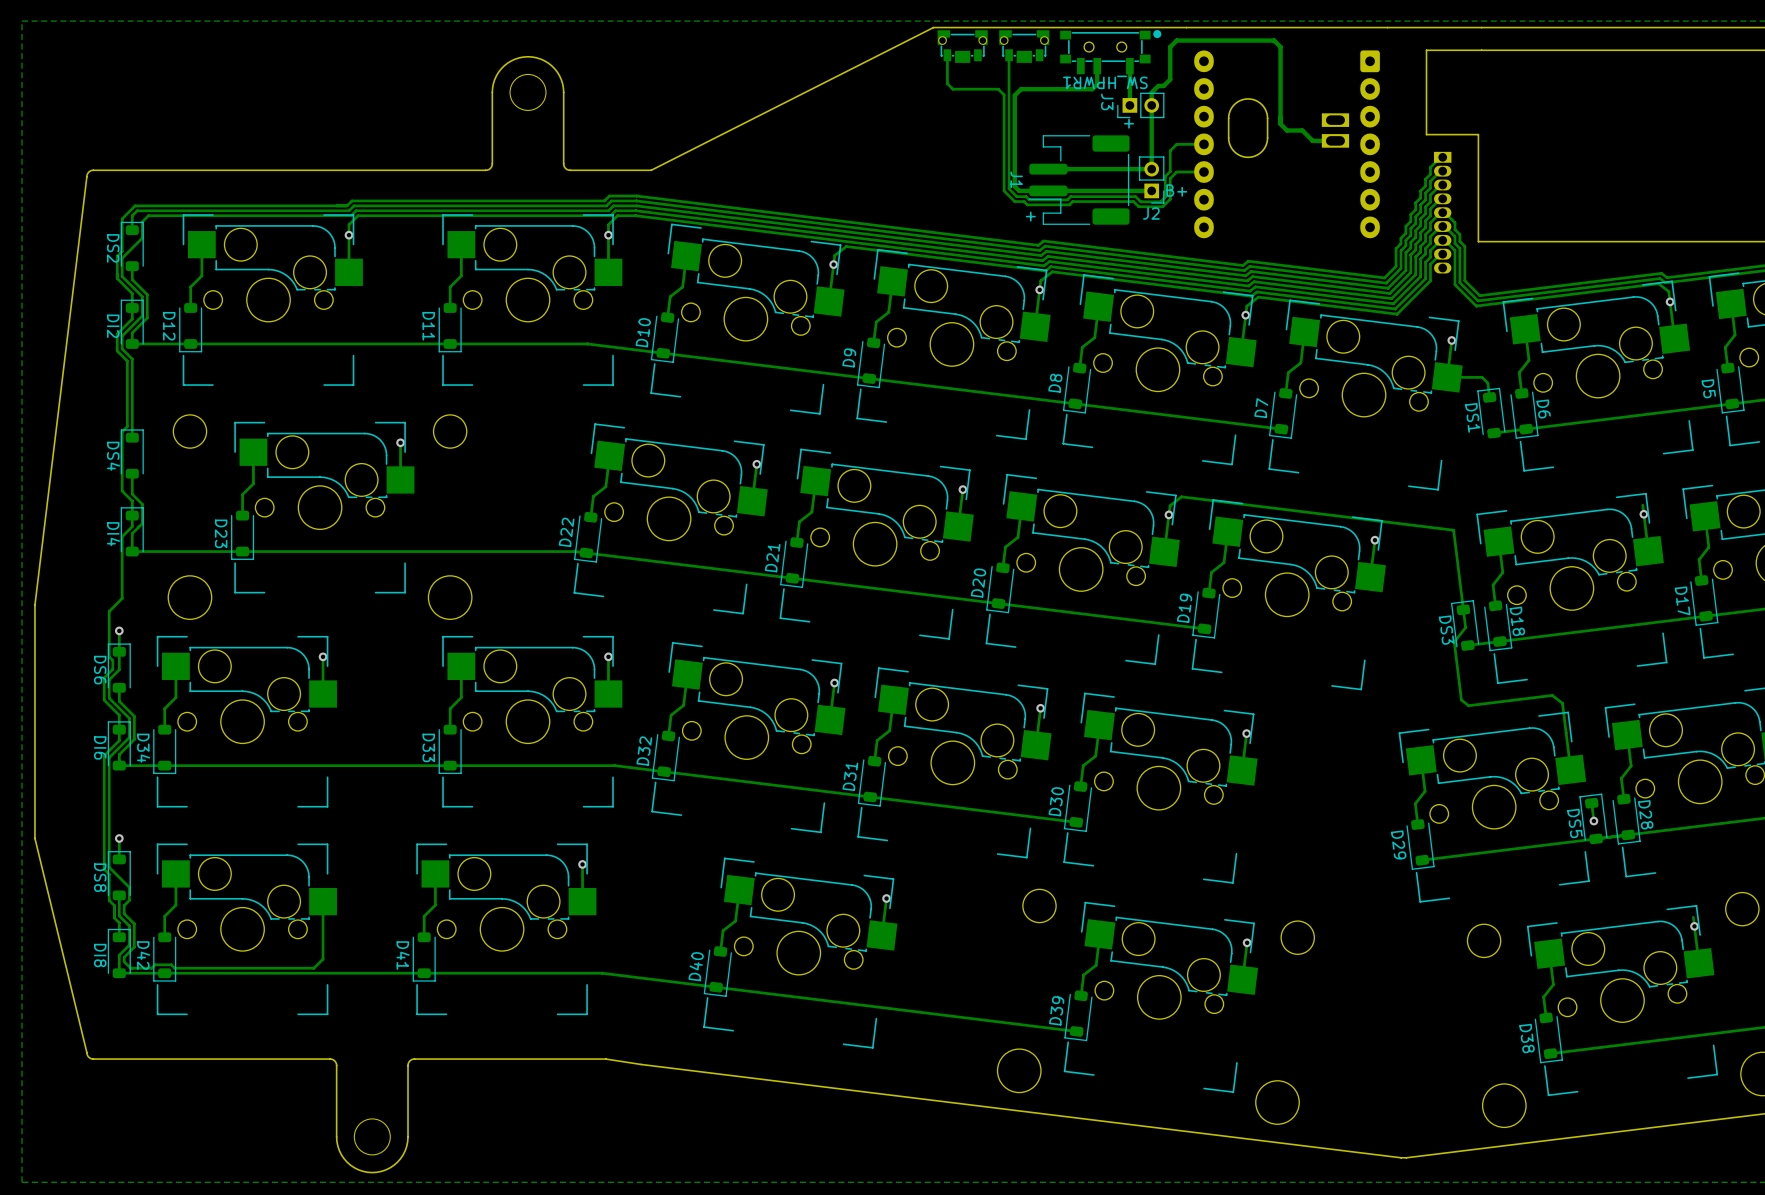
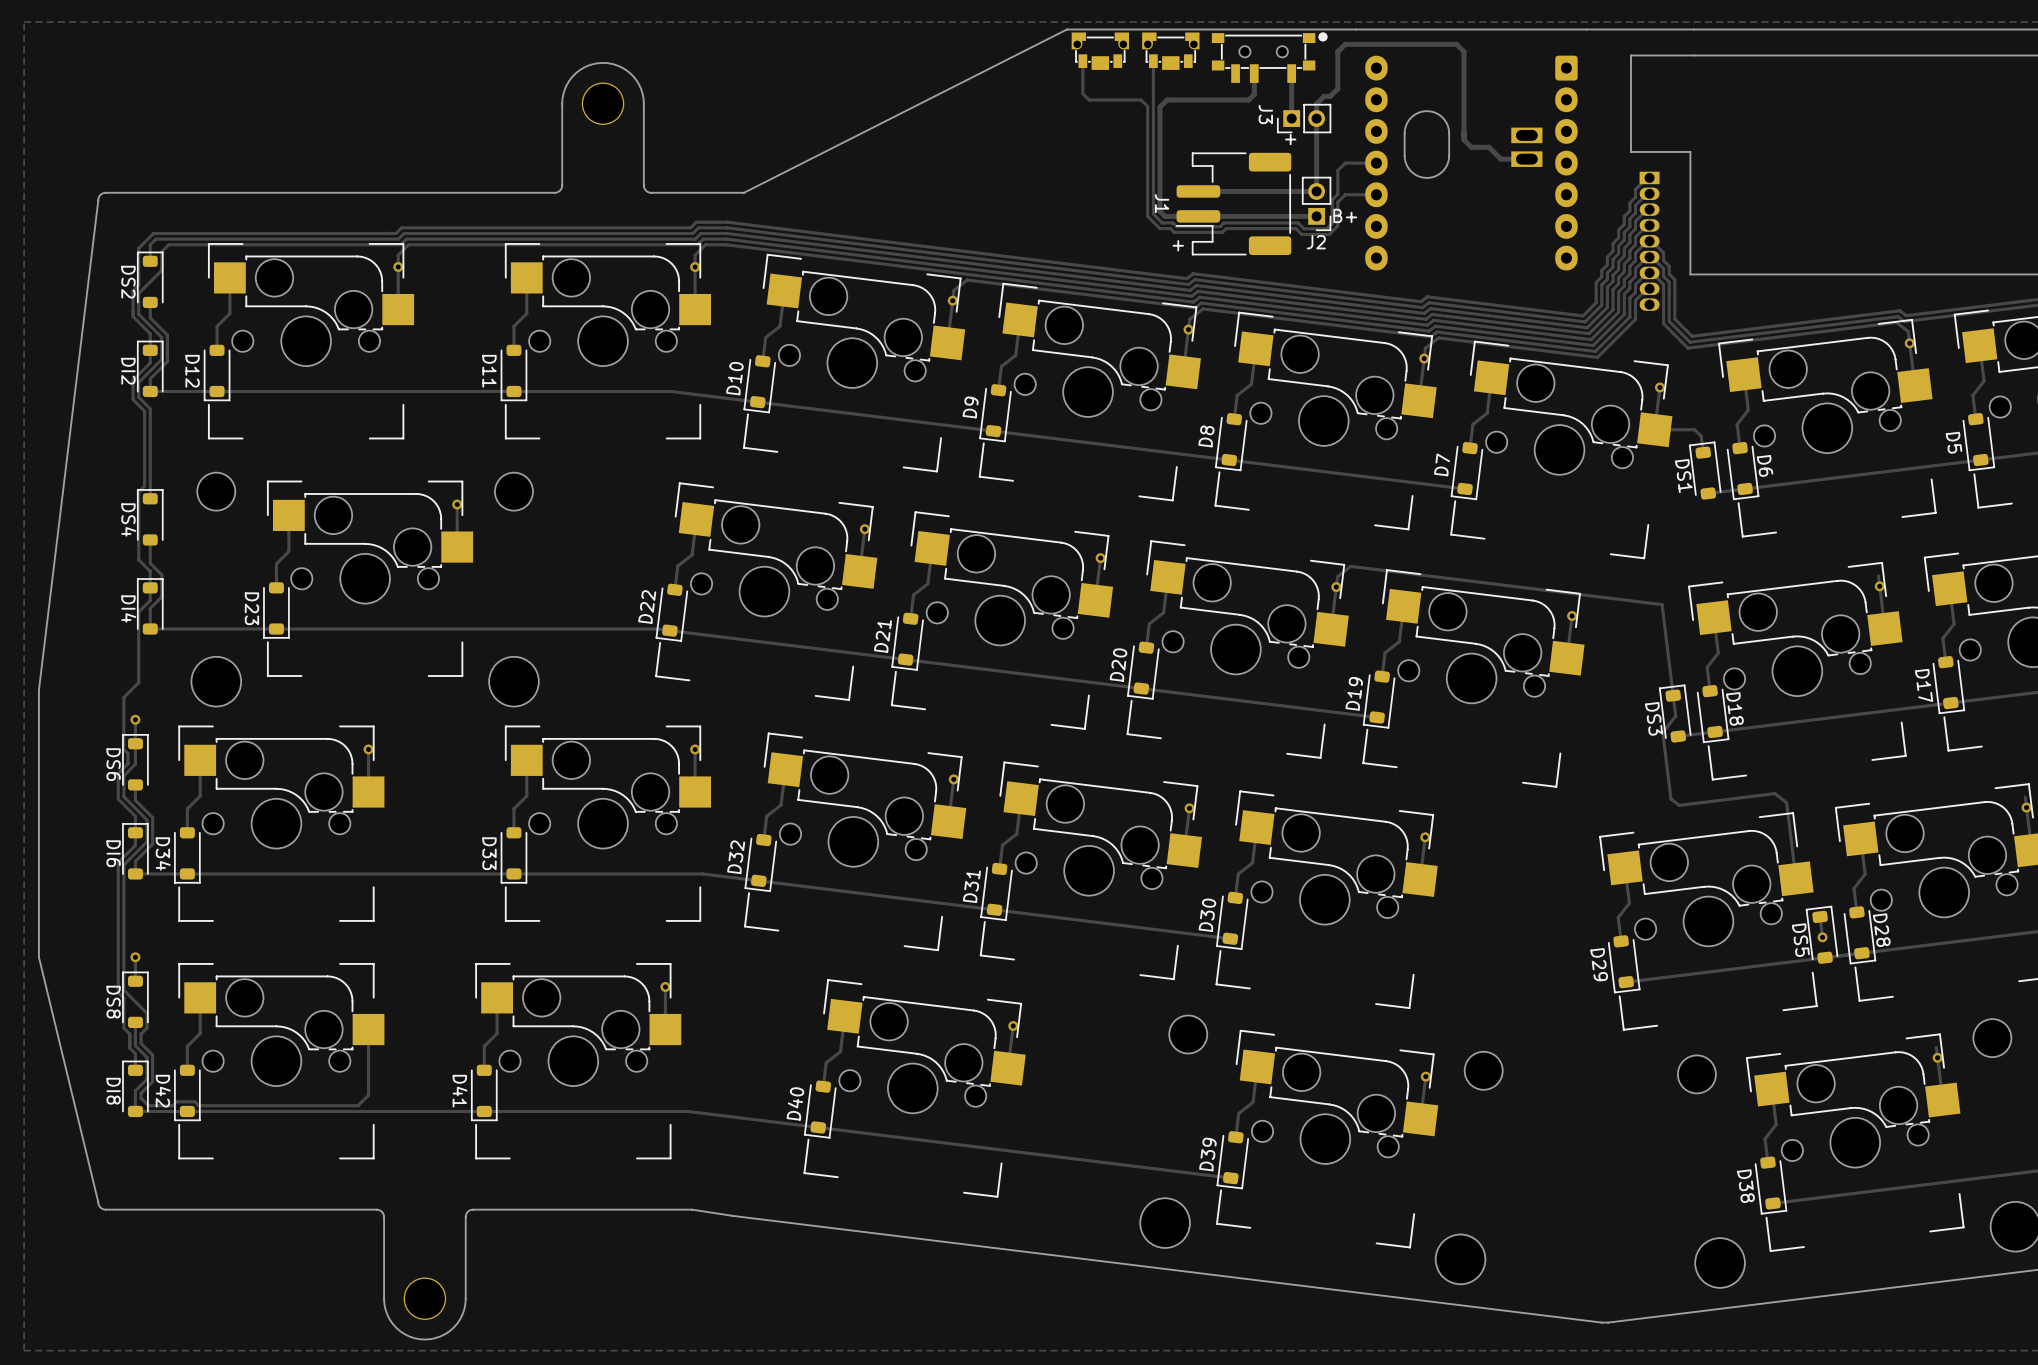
SW_HPWR1 name: SW_HPWR1 (1105, 82) -> none

